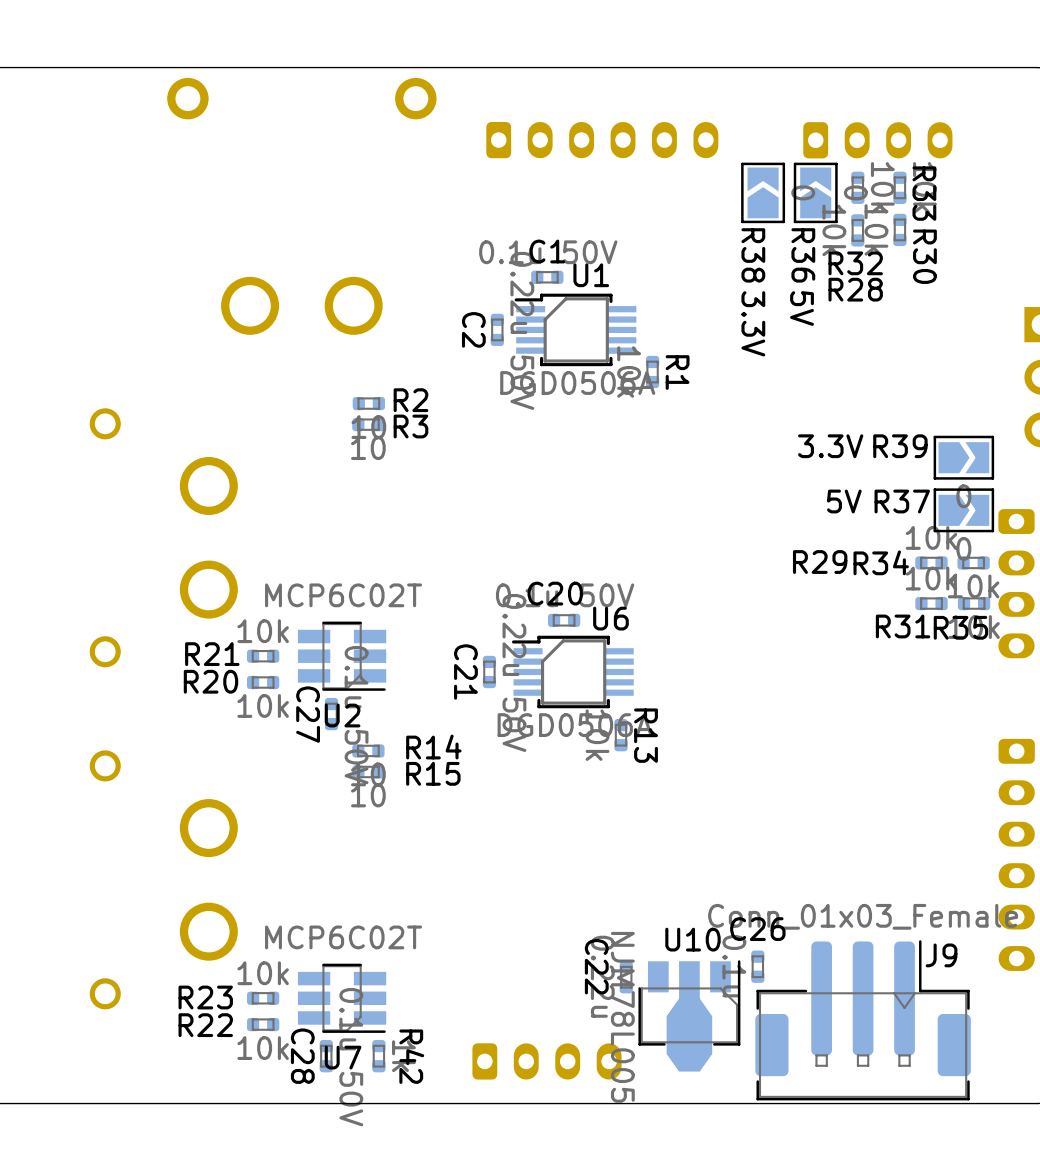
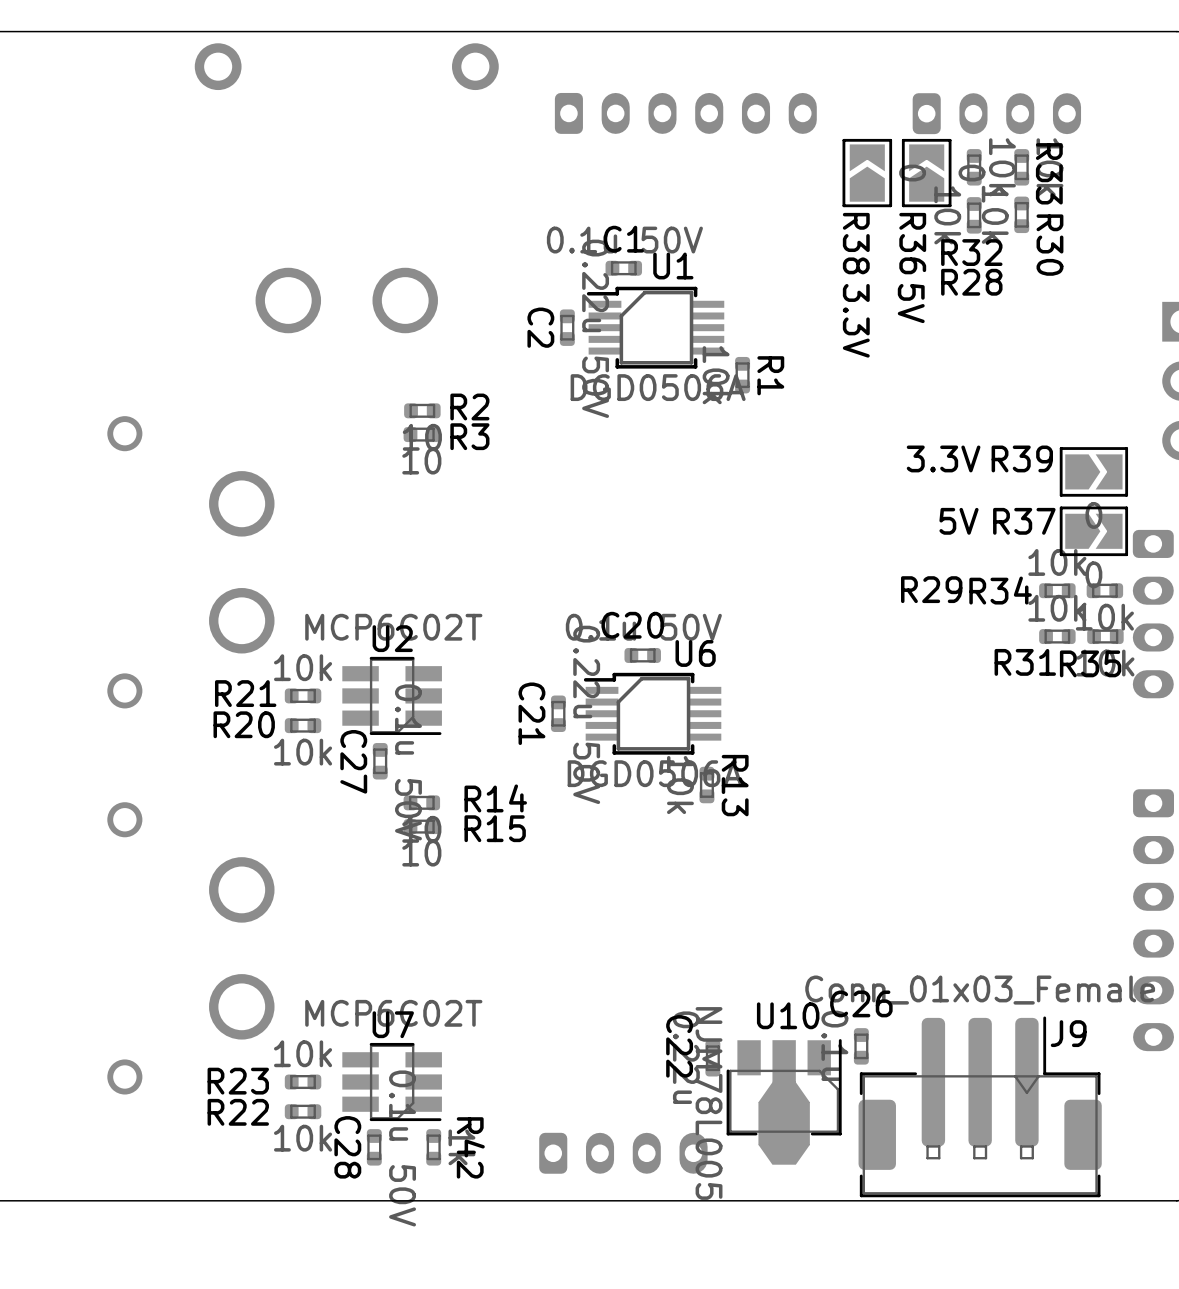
U2 name position: U2 (342, 715) -> U2 (392, 638)
U7 name position: U7 (343, 1057) -> U7 (393, 1024)

